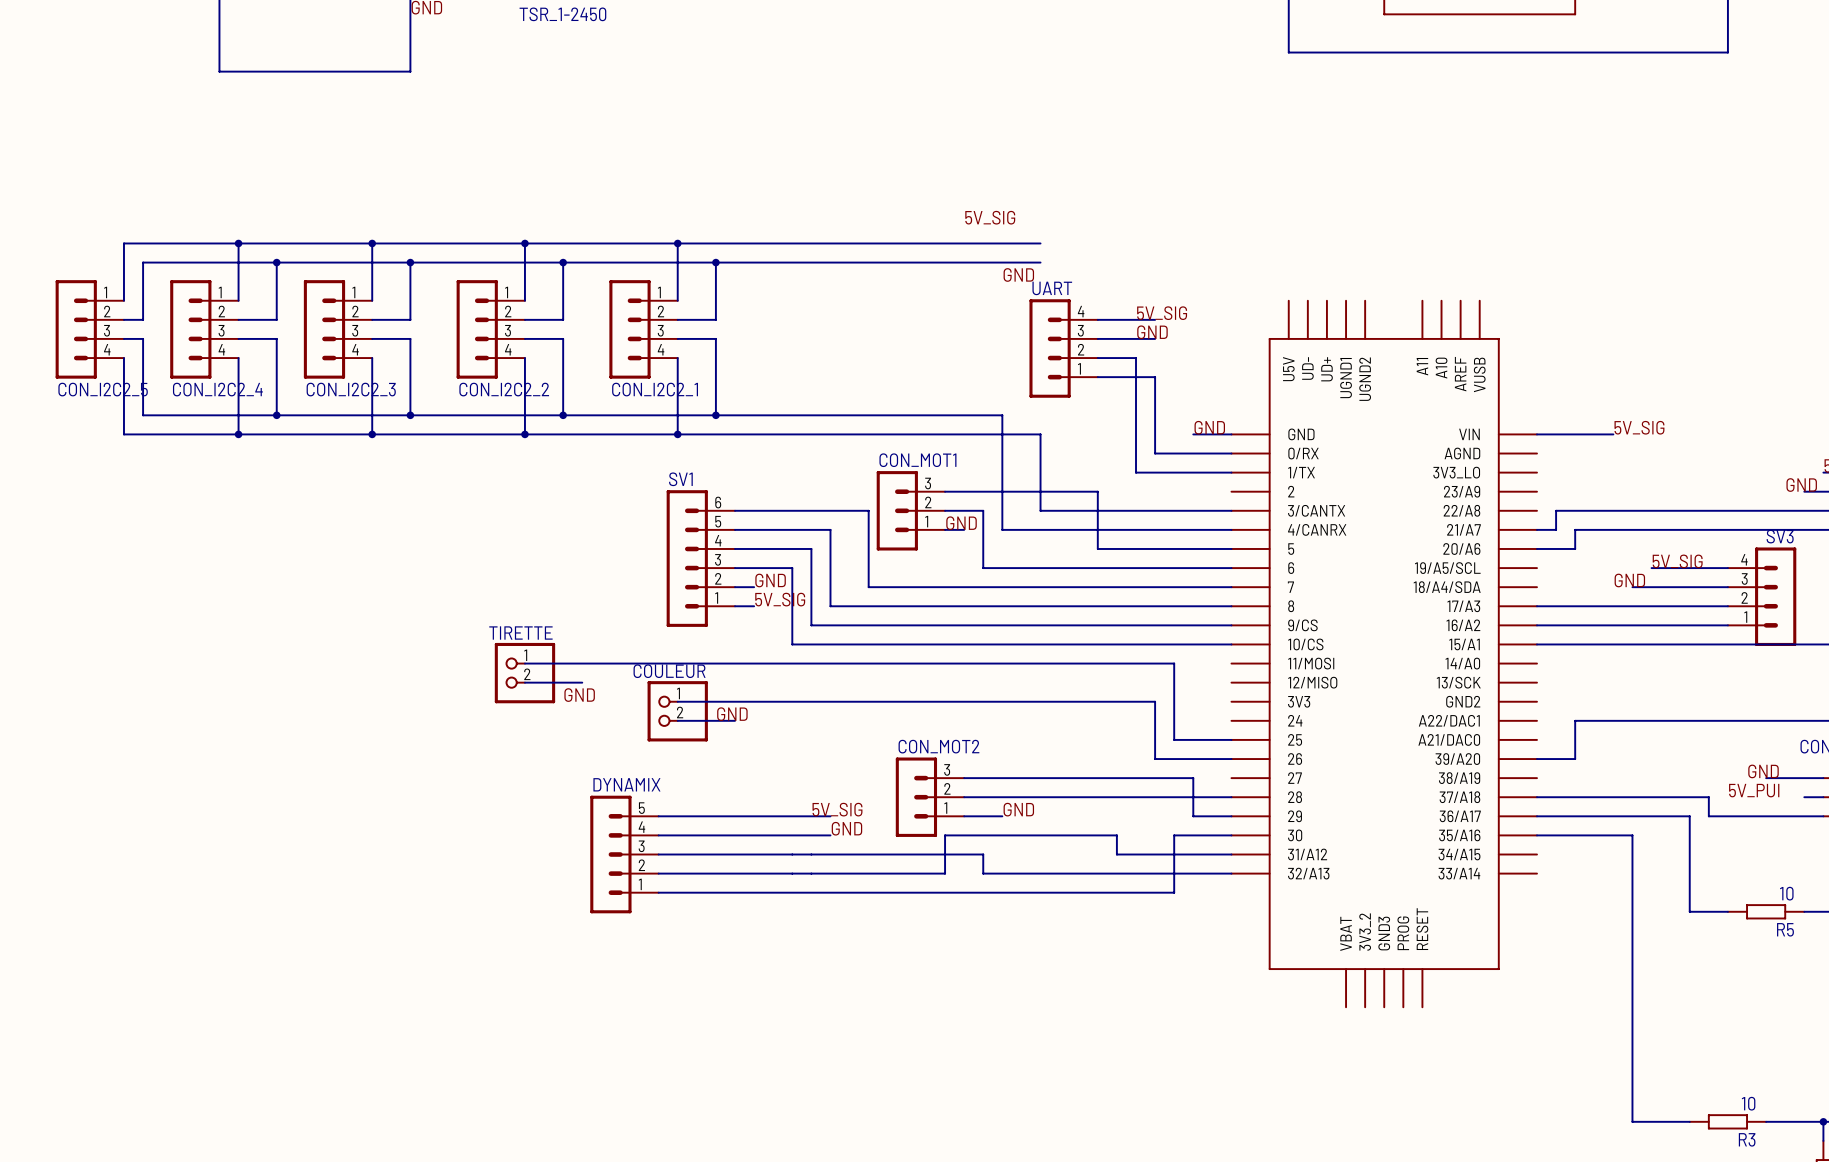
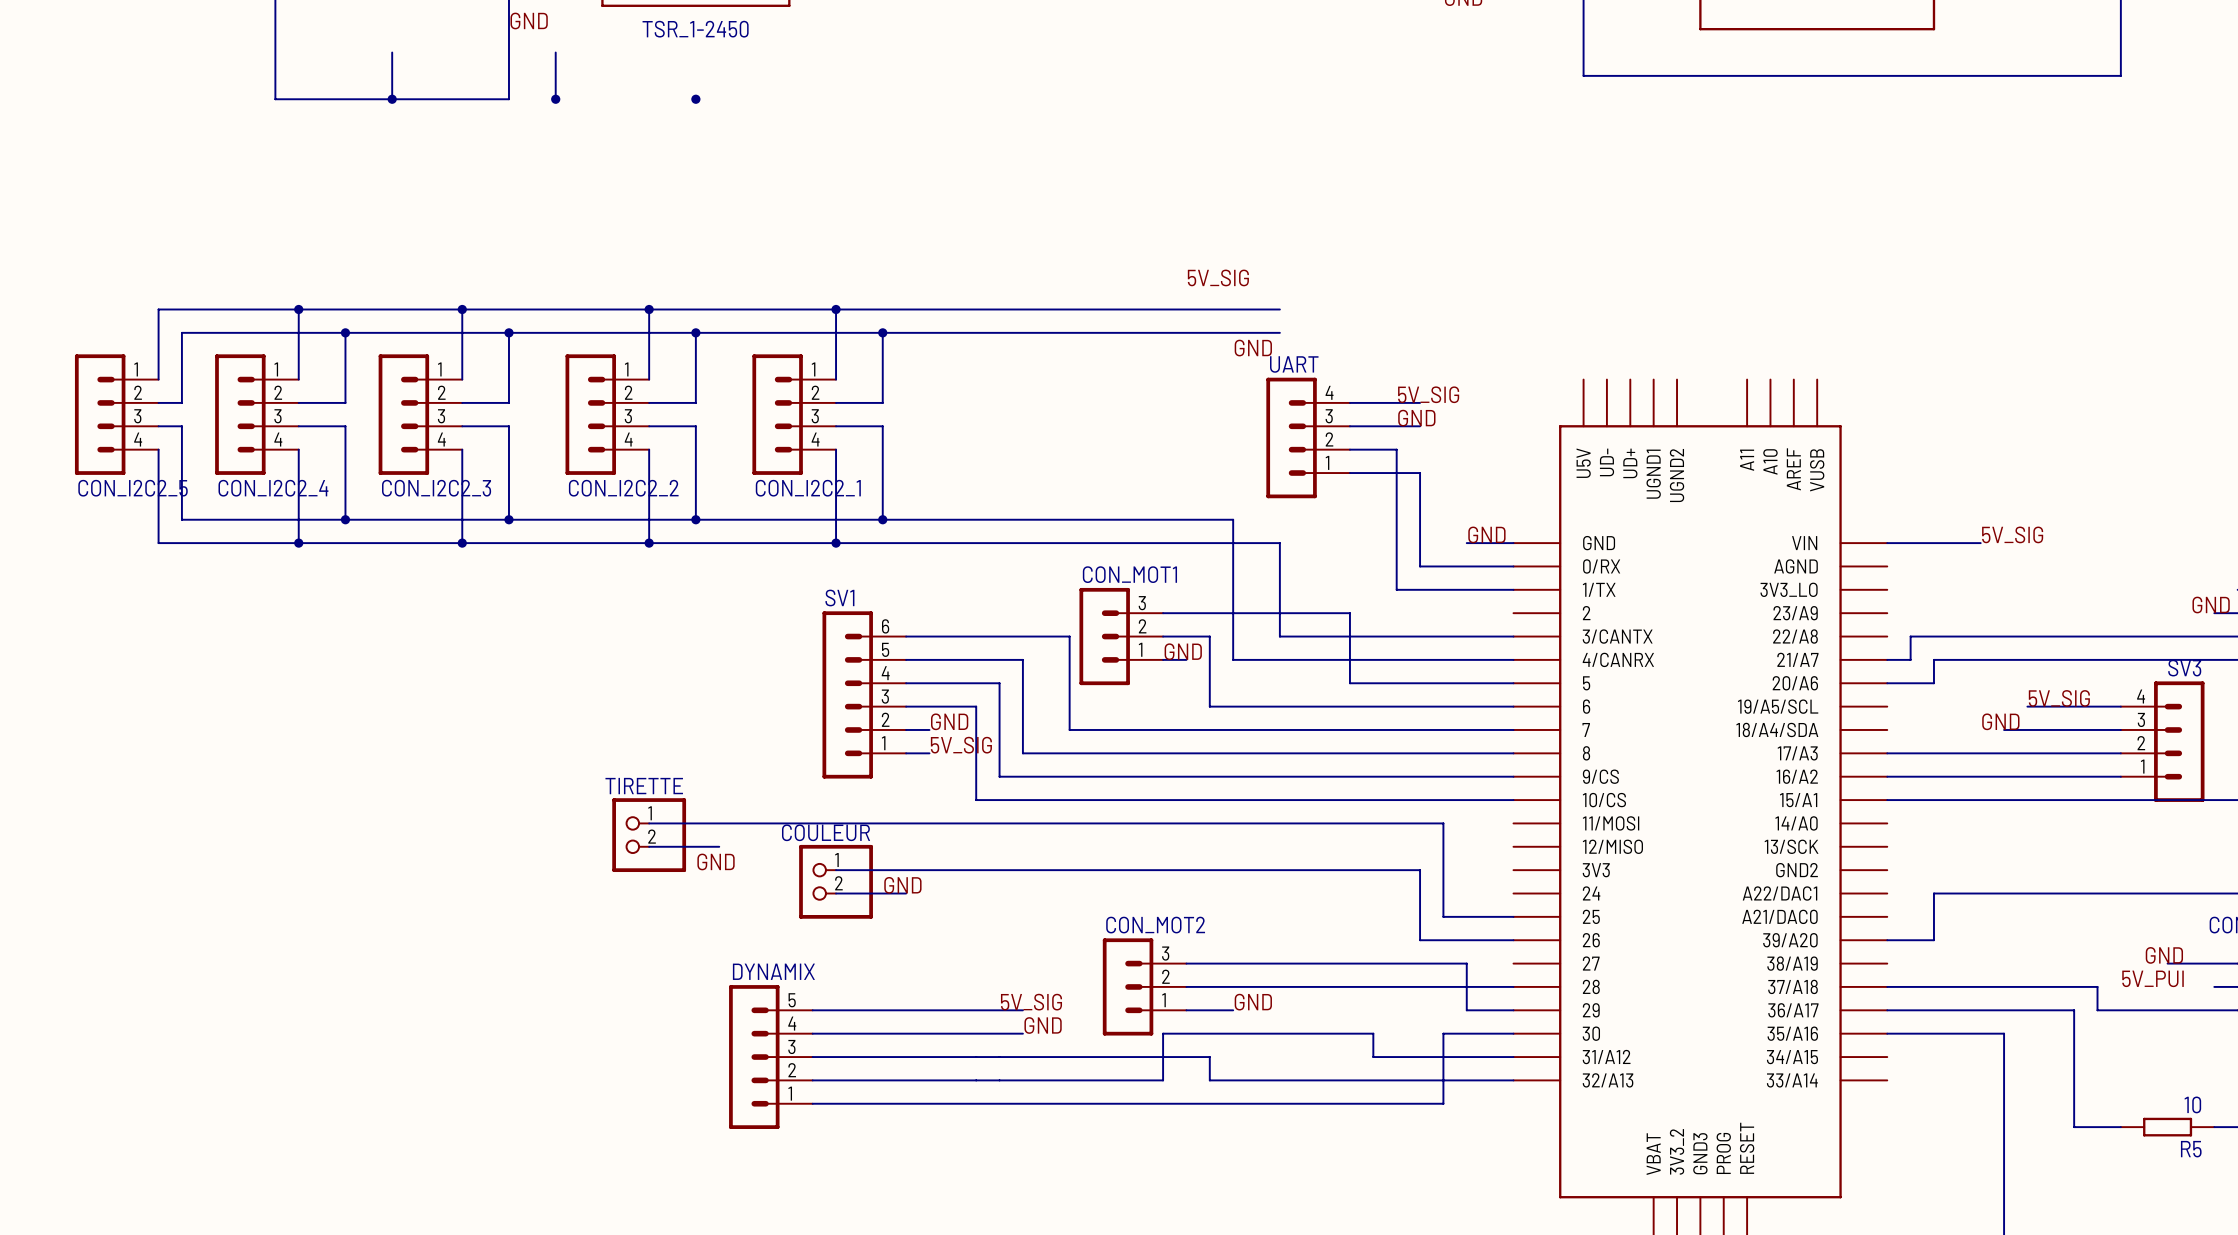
wire: none -> (392, 52) (392, 99)
wire: none -> (555, 52) (555, 99)
junction: none -> (392, 99)
junction: none -> (555, 99)
junction: none -> (695, 99)

